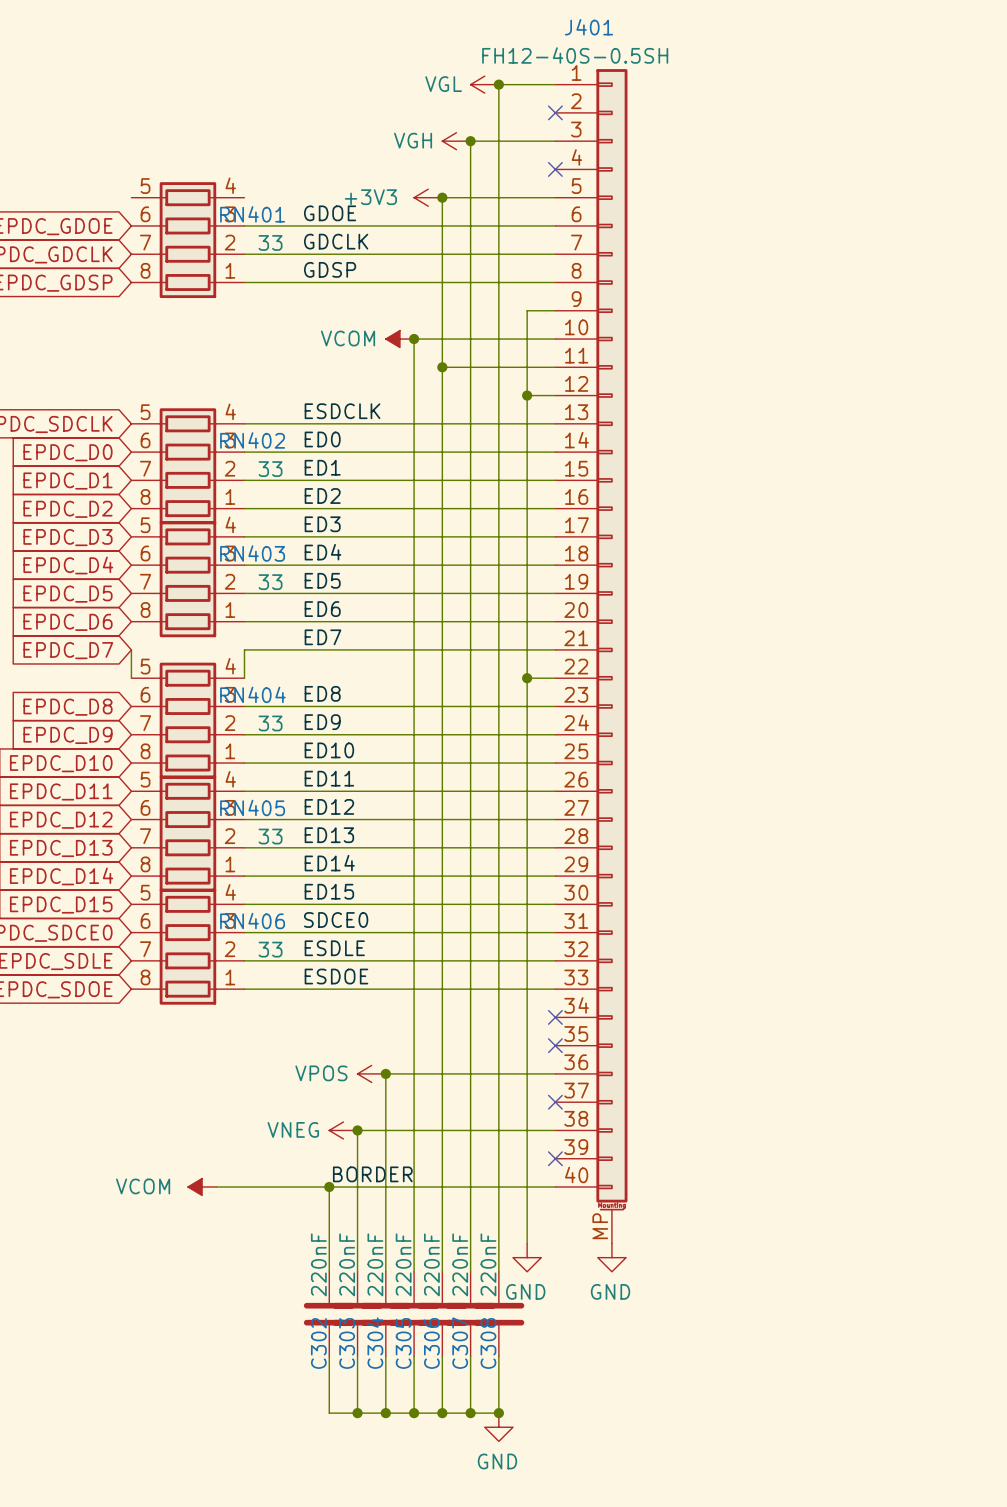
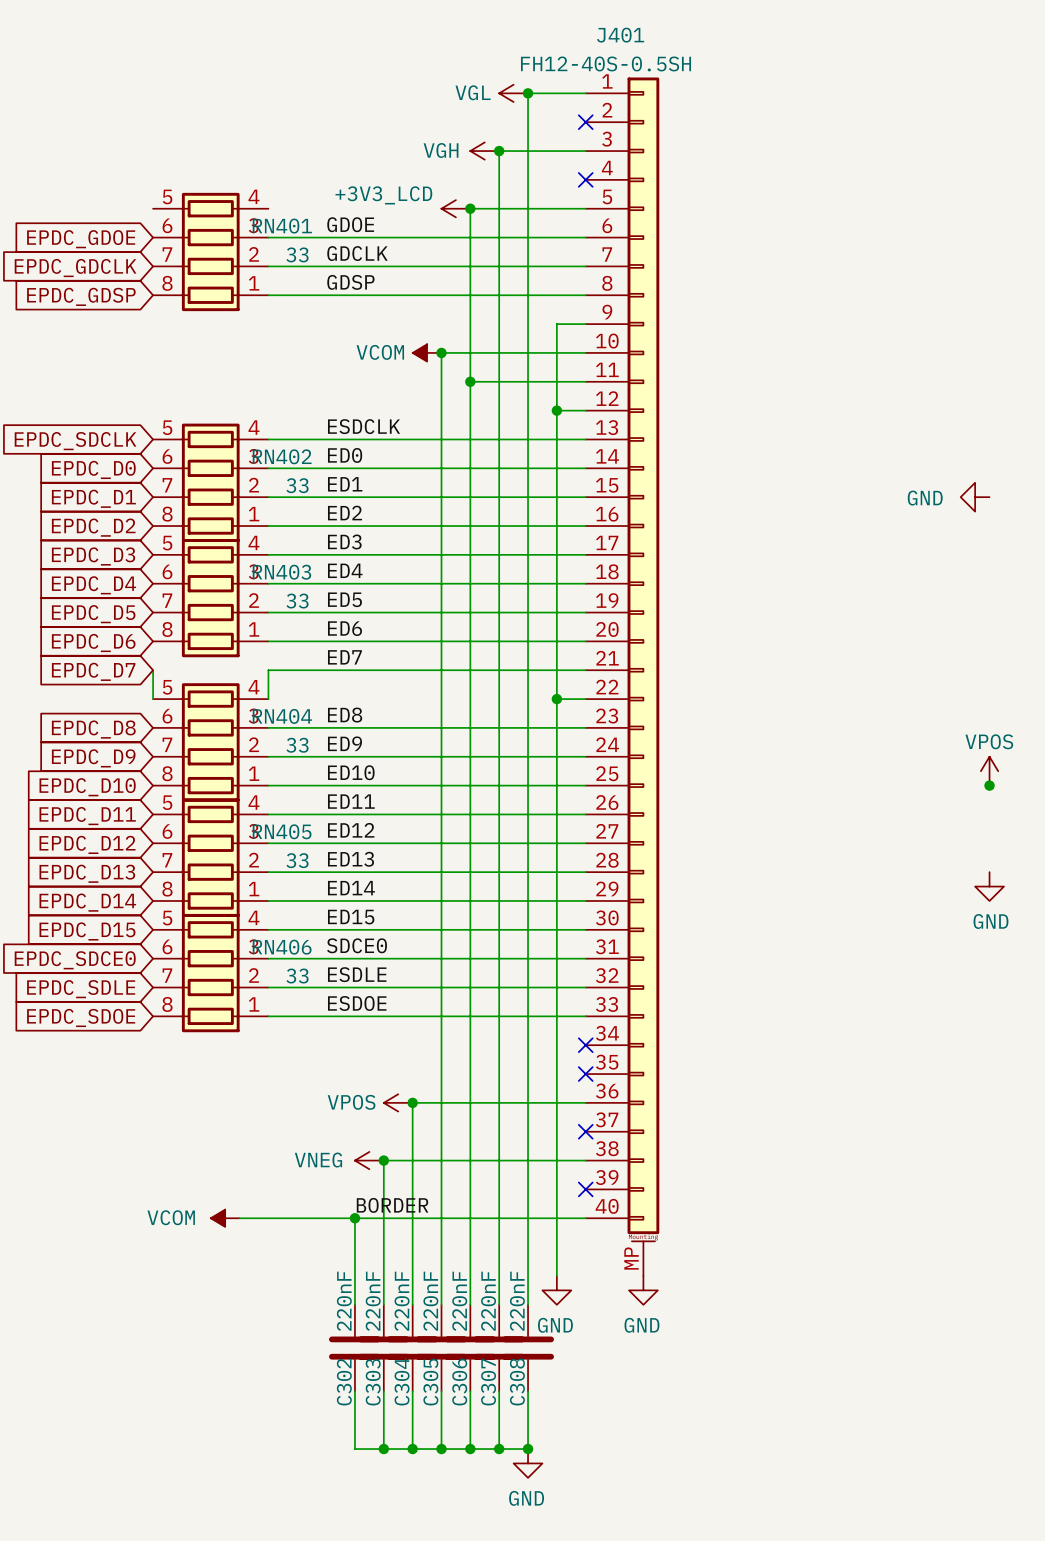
power symbol: +3V3 (428, 197) -> +3V3_LCD (455, 208)
power symbol: none -> GND (975, 497)
power symbol: none -> VPOS (989, 771)
junction: none -> (989, 785)
power symbol: none -> GND (989, 886)

